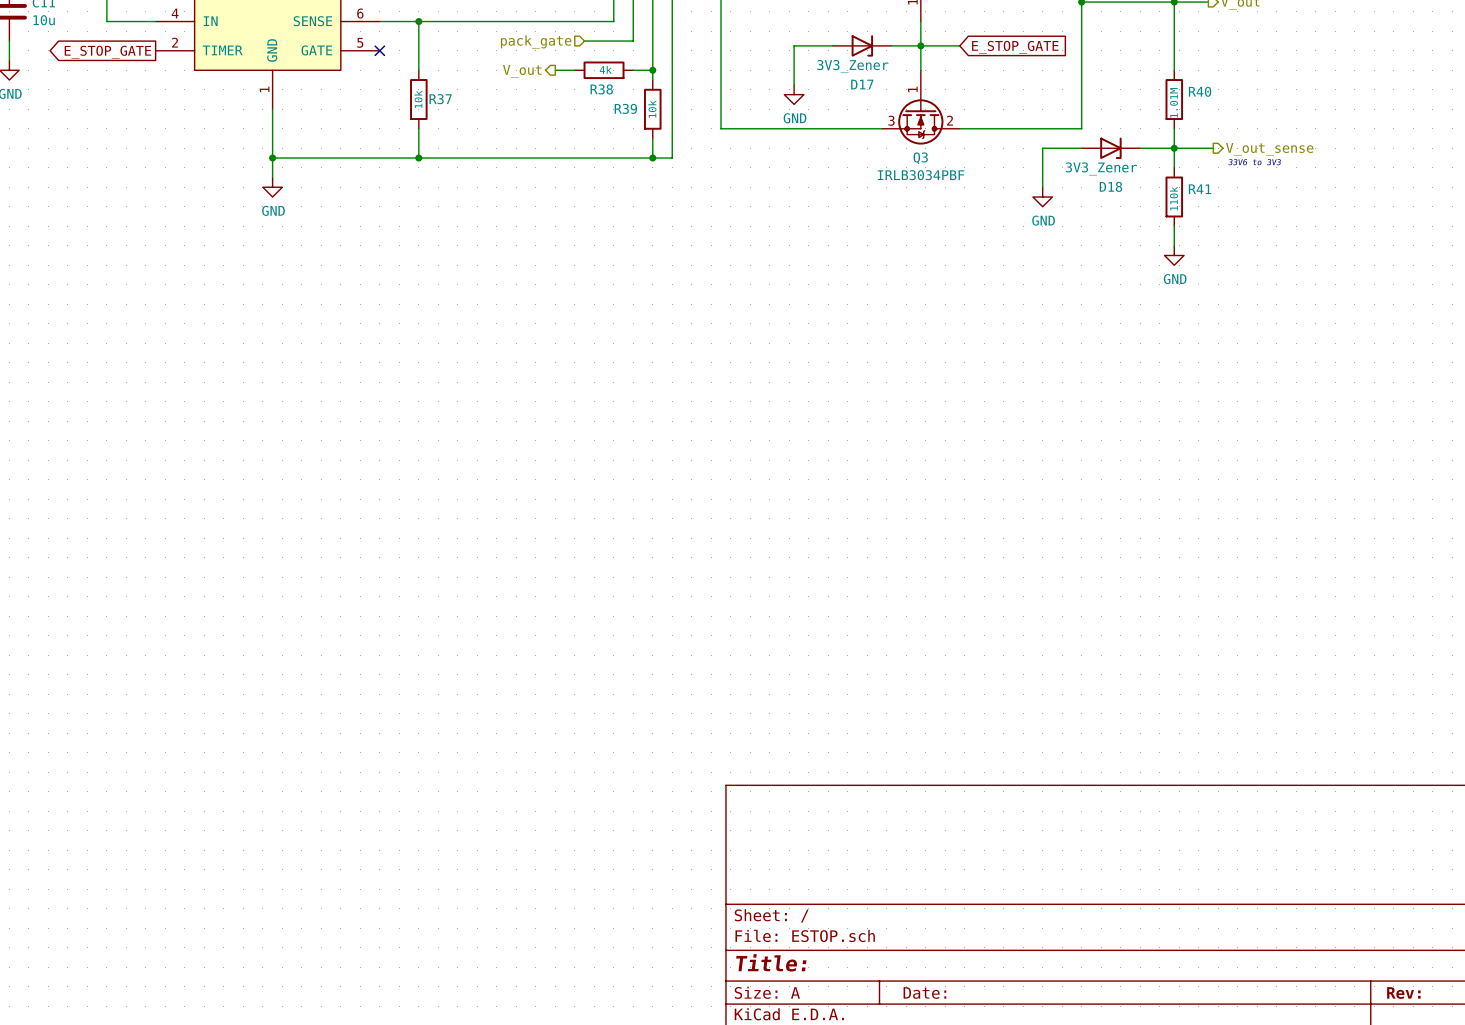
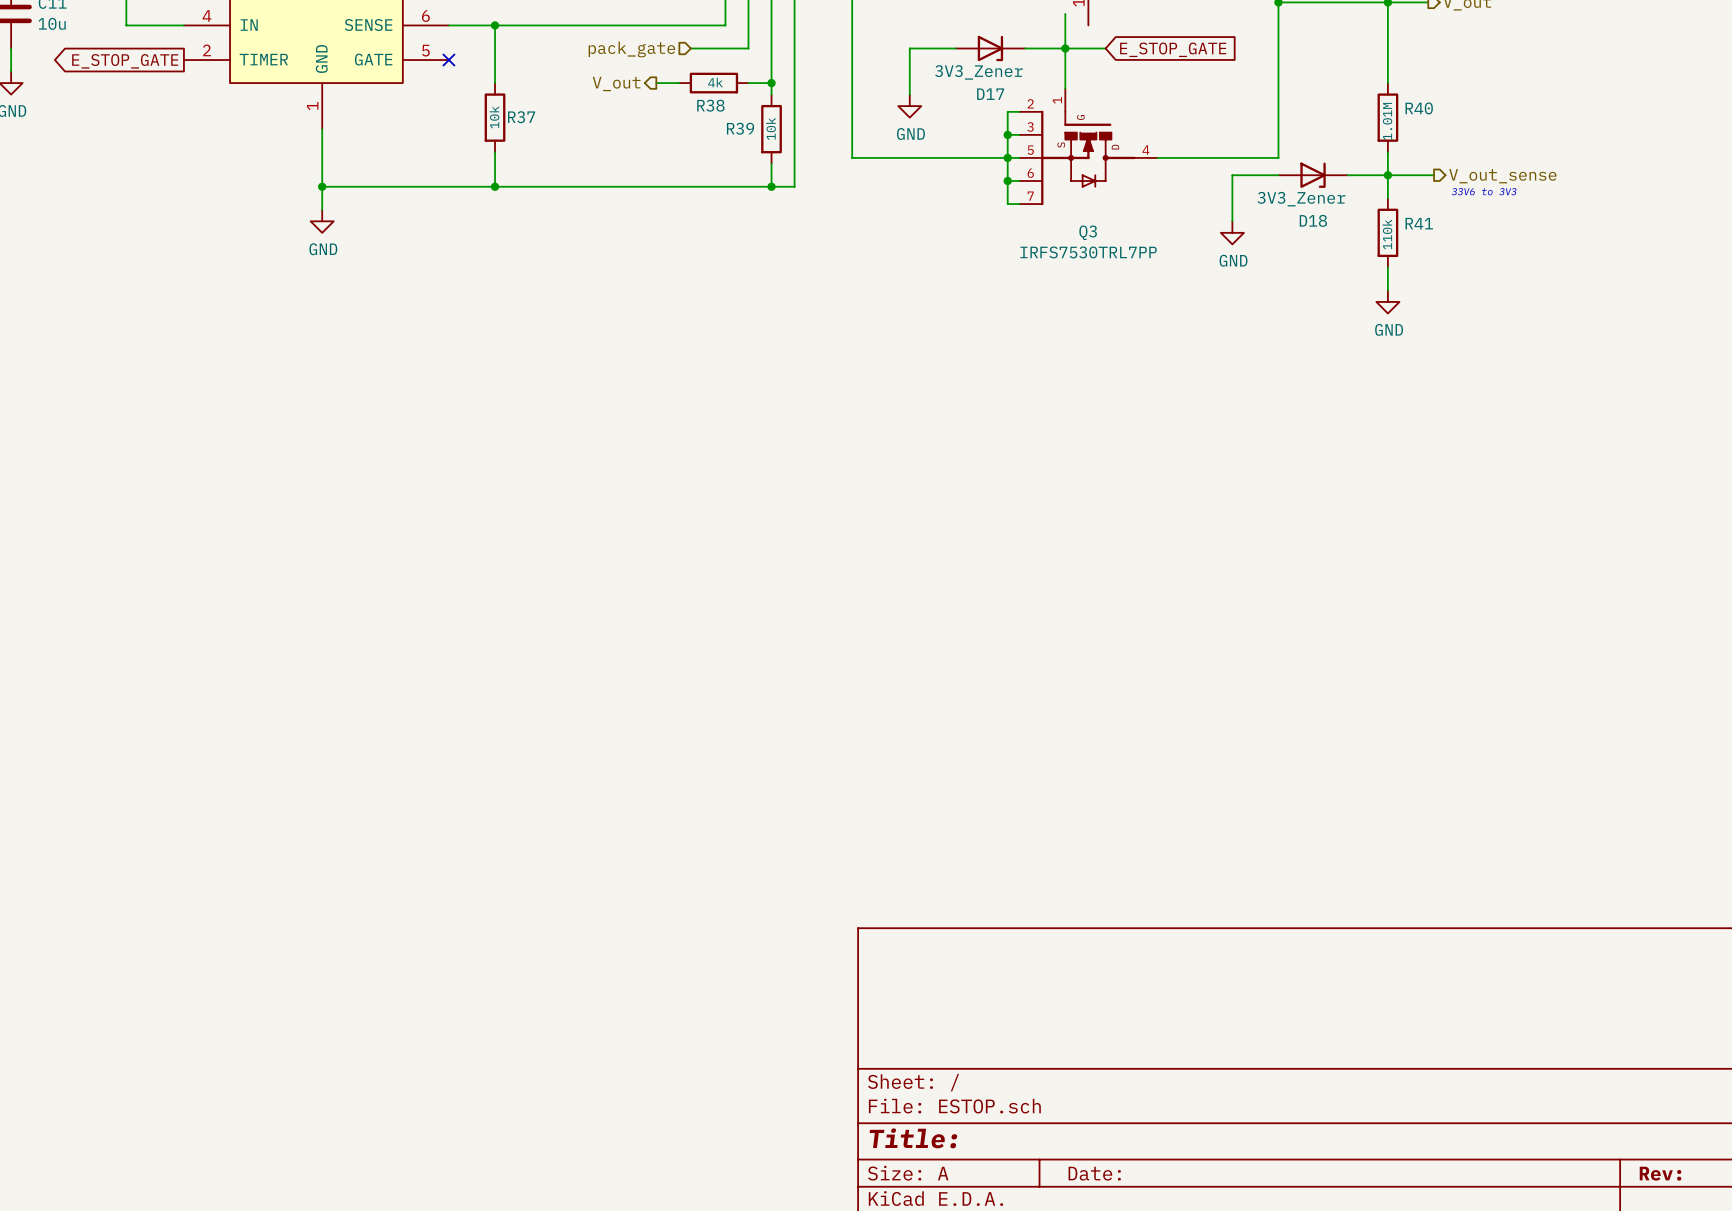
wire: none -> (1065, 13) (1065, 88)
wire: (920, 21) (920, 70) -> none
wire: (833, 45) (794, 45) (794, 84) -> (955, 48) (909, 48) (909, 94)
D17 position: (862, 45) -> (990, 48)
wire: (891, 45) (959, 45) -> (1025, 48) (1105, 48)
junction position: (920, 45) -> (1065, 48)
global label position: E_STOP_GATE (1015, 47) -> E_STOP_GATE (1173, 49)
Q3 symbol: [881, 70, 960, 145] -> [1019, 88, 1158, 206]
power symbol position: GND (794, 94) -> GND (909, 106)
wire: none -> (1019, 111) (1007, 111) (1007, 204) (1019, 204)
wire: none -> (1007, 134) (1019, 134)
junction: none -> (1007, 134)
wire: (721, 128) (881, 128) -> (852, 152) (852, 157) (1019, 157)
wire: (959, 128) (1081, 128) -> (1157, 157) (1278, 157) (1278, 152)
junction: none -> (1007, 157)
wire: none -> (1007, 180) (1019, 180)
junction: none -> (1007, 180)
Q3 name position: Q3 (920, 158) -> Q3 (1088, 232)
Q3 value: IRLB3034PBF (921, 175) -> IRFS7530TRL7PP (1088, 252)

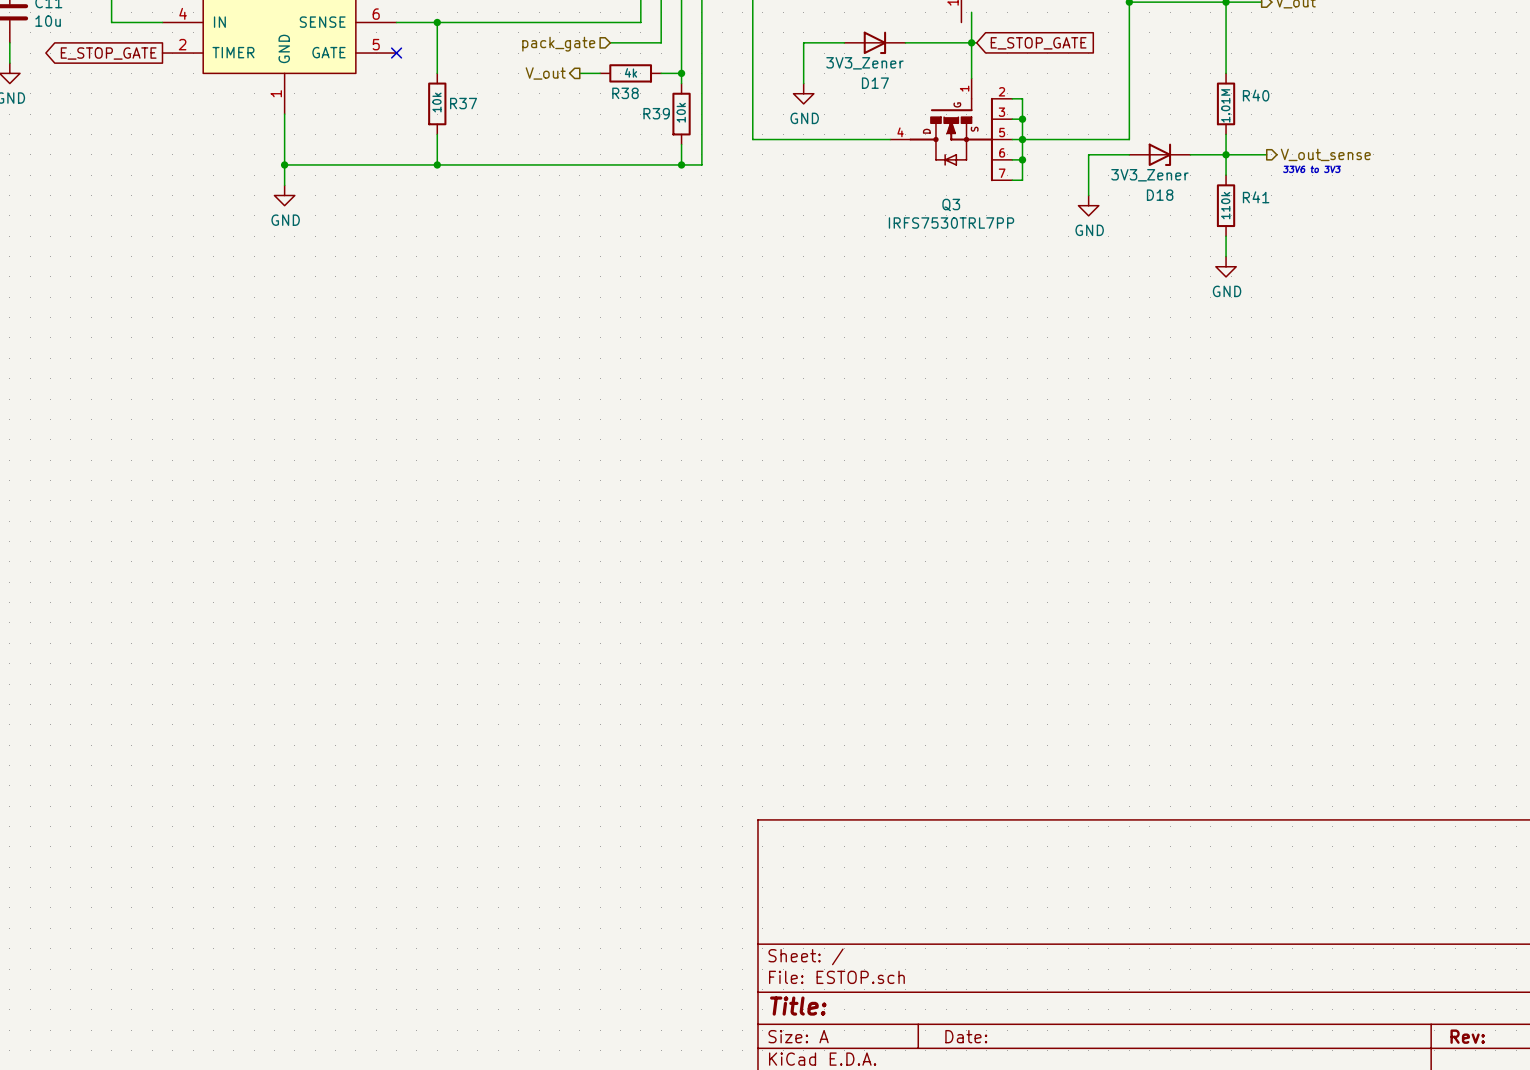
wire: (1065, 13) (1065, 88) -> (971, 12) (971, 78)
junction position: (1065, 48) -> (971, 42)
wire: (1019, 111) (1007, 111) (1007, 204) (1019, 204) -> none
wire: none -> (1012, 98) (1022, 98) (1022, 180) (1012, 180)
wire: (1007, 134) (1019, 134) -> (1012, 119) (1022, 119)
junction: (1007, 134) -> none
junction: none -> (1022, 119)
junction: (1007, 157) -> none
Q3 flip: as is (1088, 157) -> left-right (951, 139)
junction: none -> (1022, 139)
wire: (1007, 180) (1019, 180) -> (1012, 159) (1022, 159)
junction: (1007, 180) -> none
junction: none -> (1022, 159)

